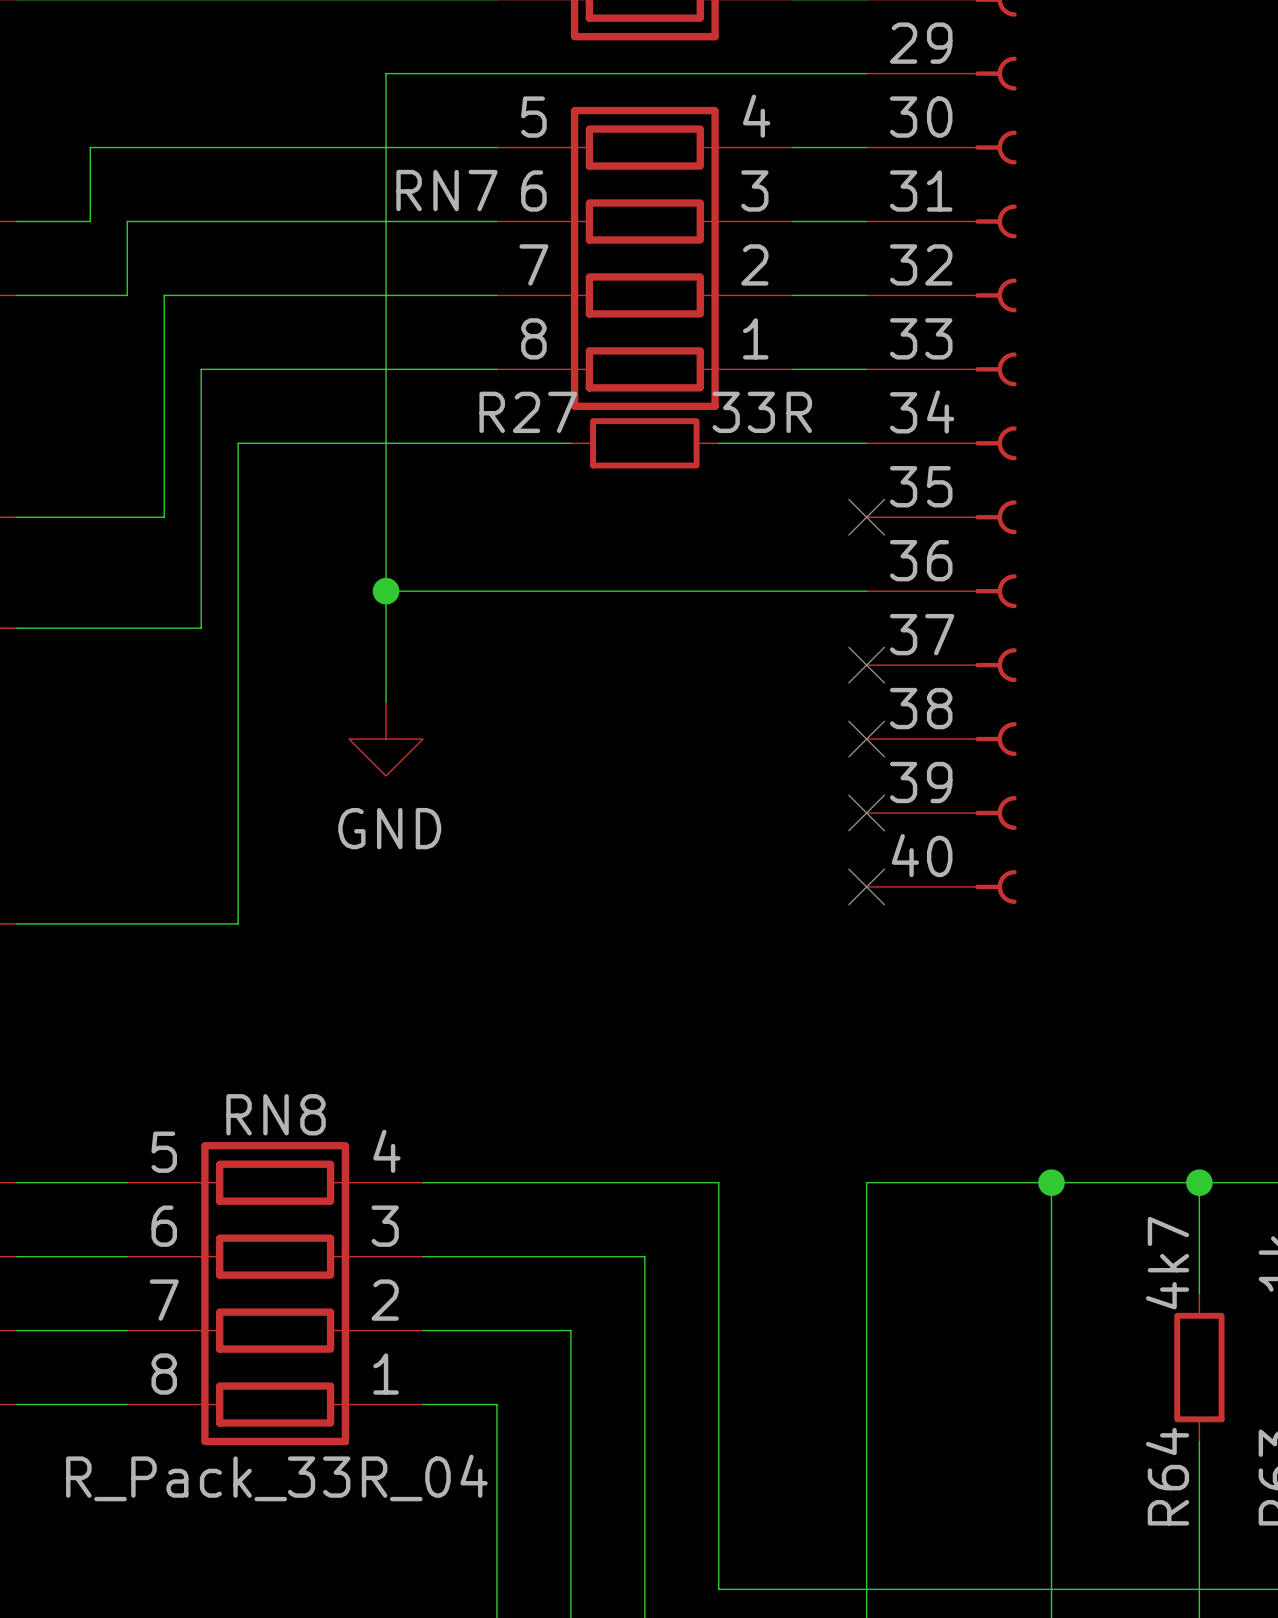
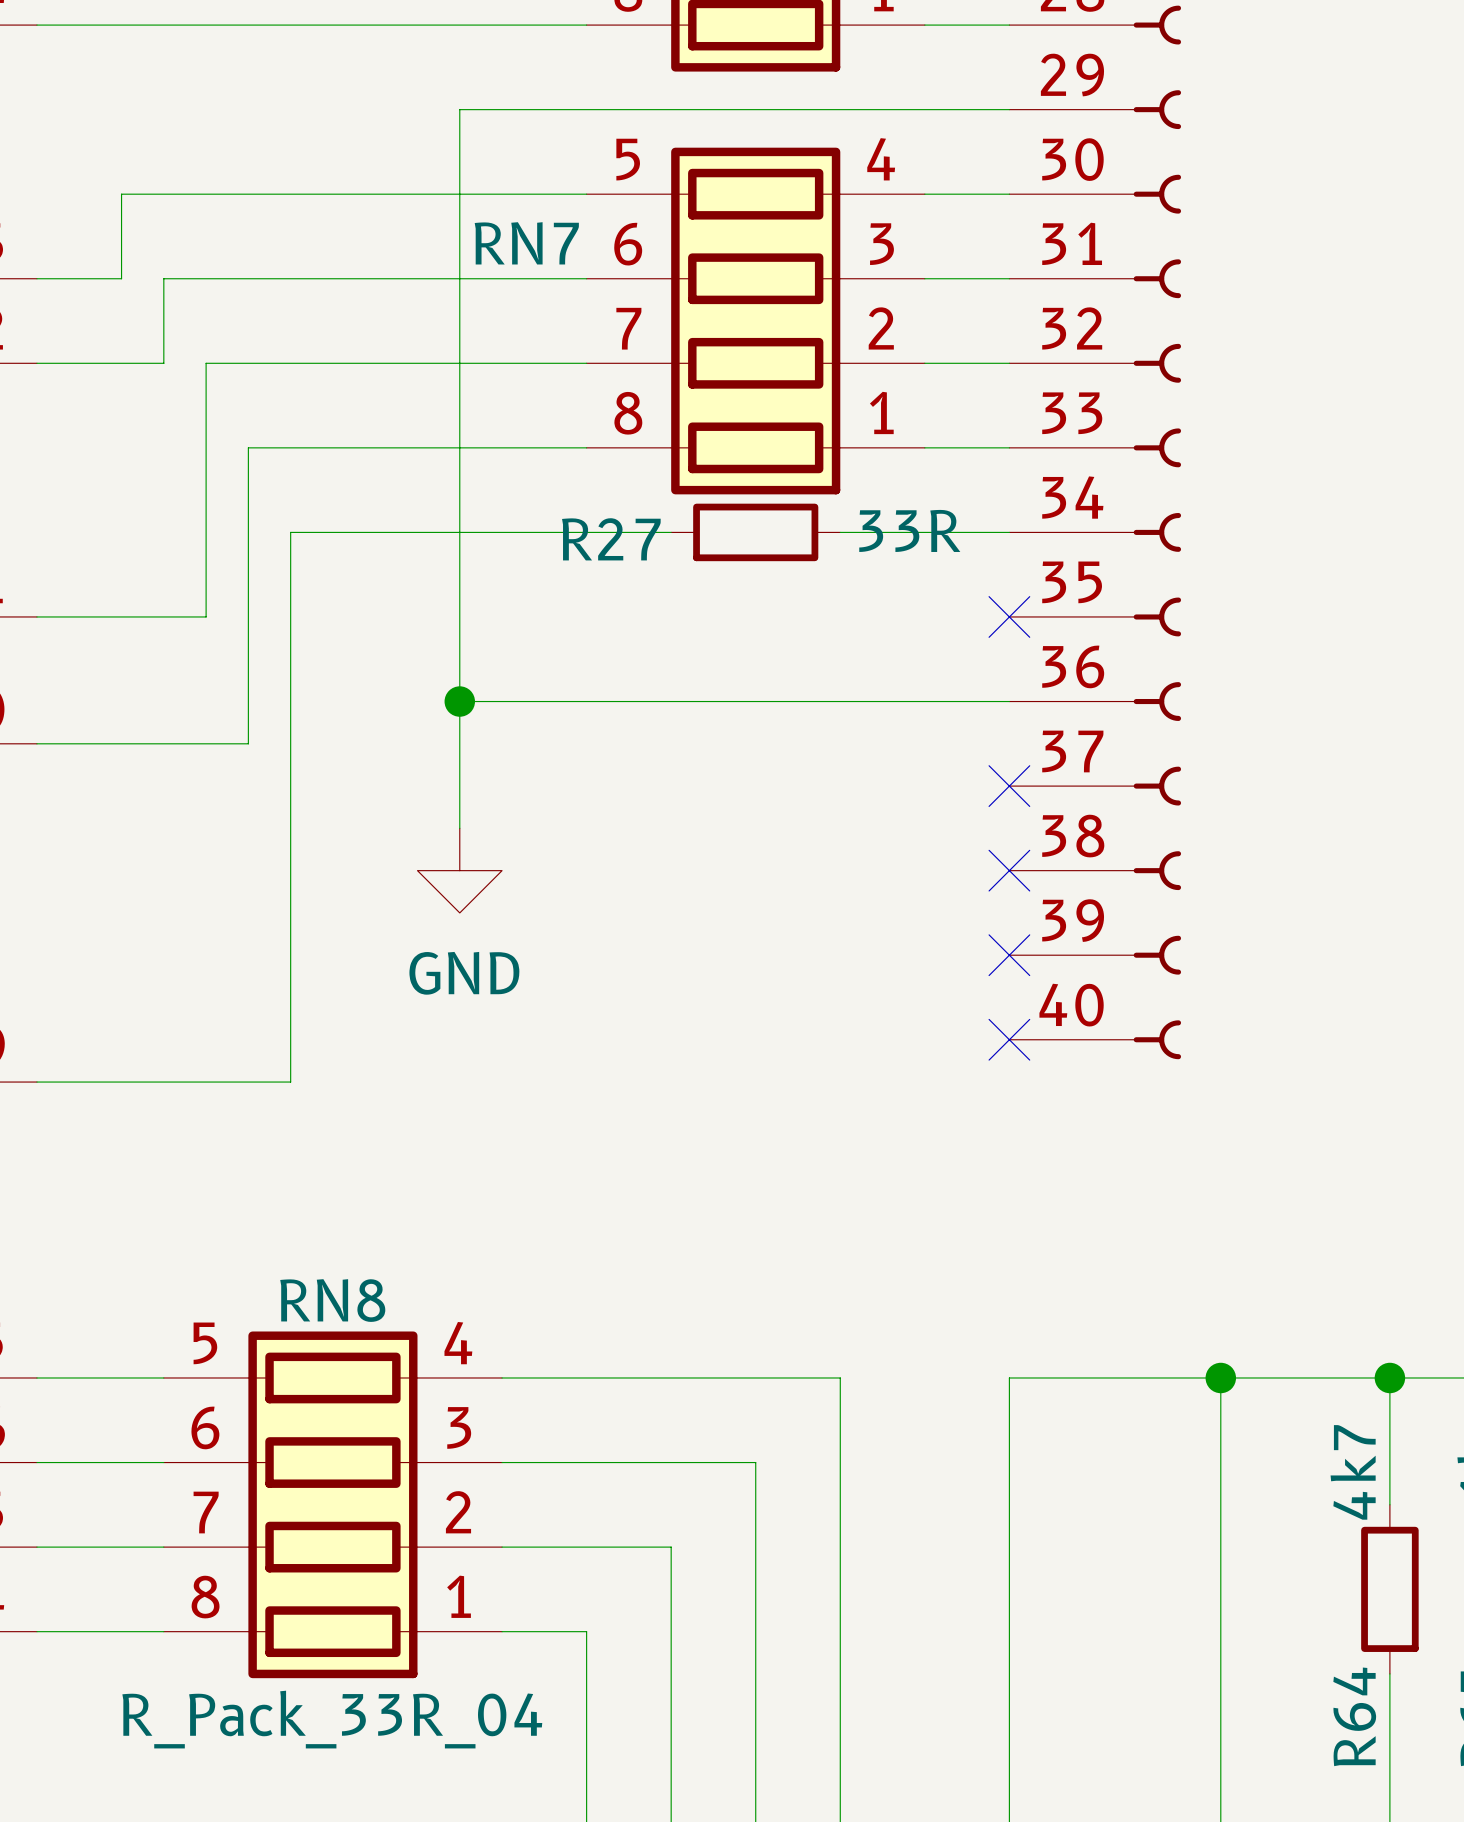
R27 name position: R27 (528, 412) -> R27 (611, 539)
R27 value position: 33R (762, 412) -> 33R (909, 530)

